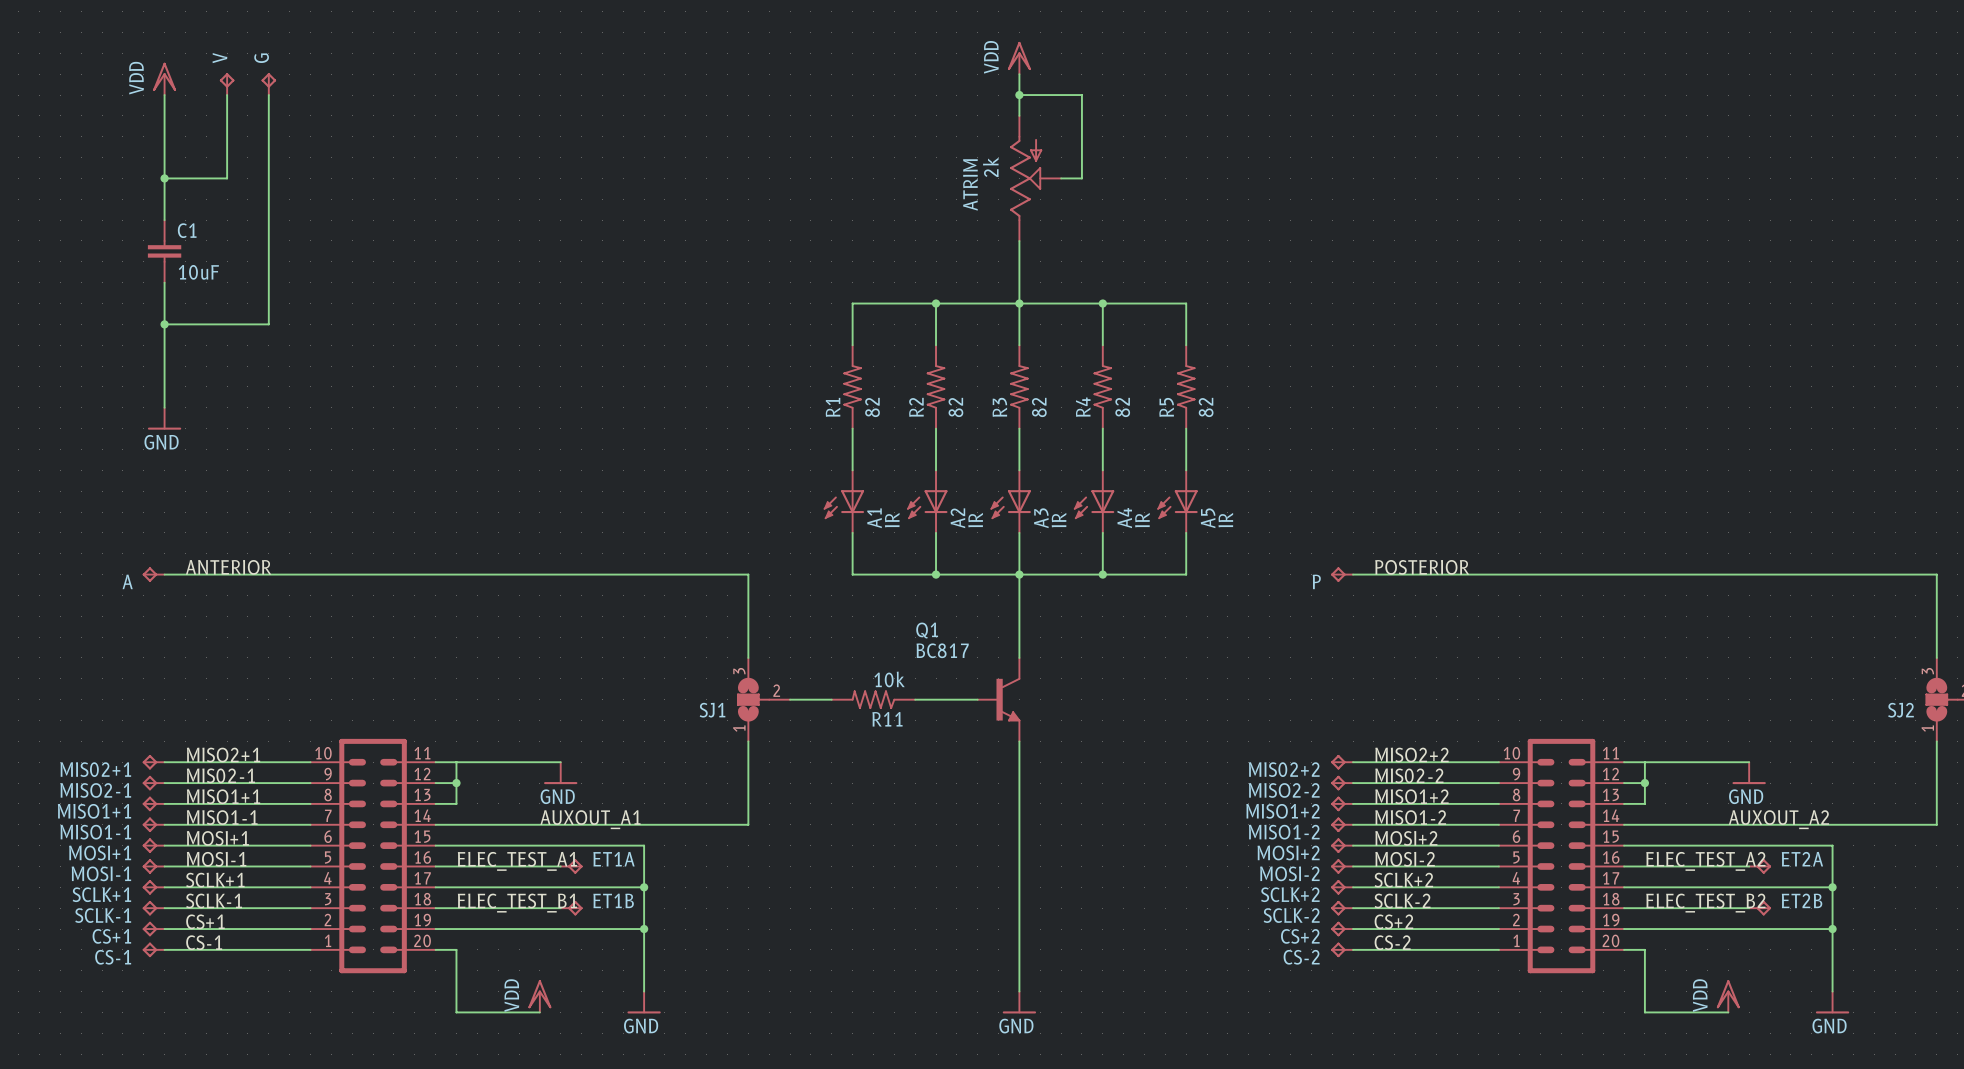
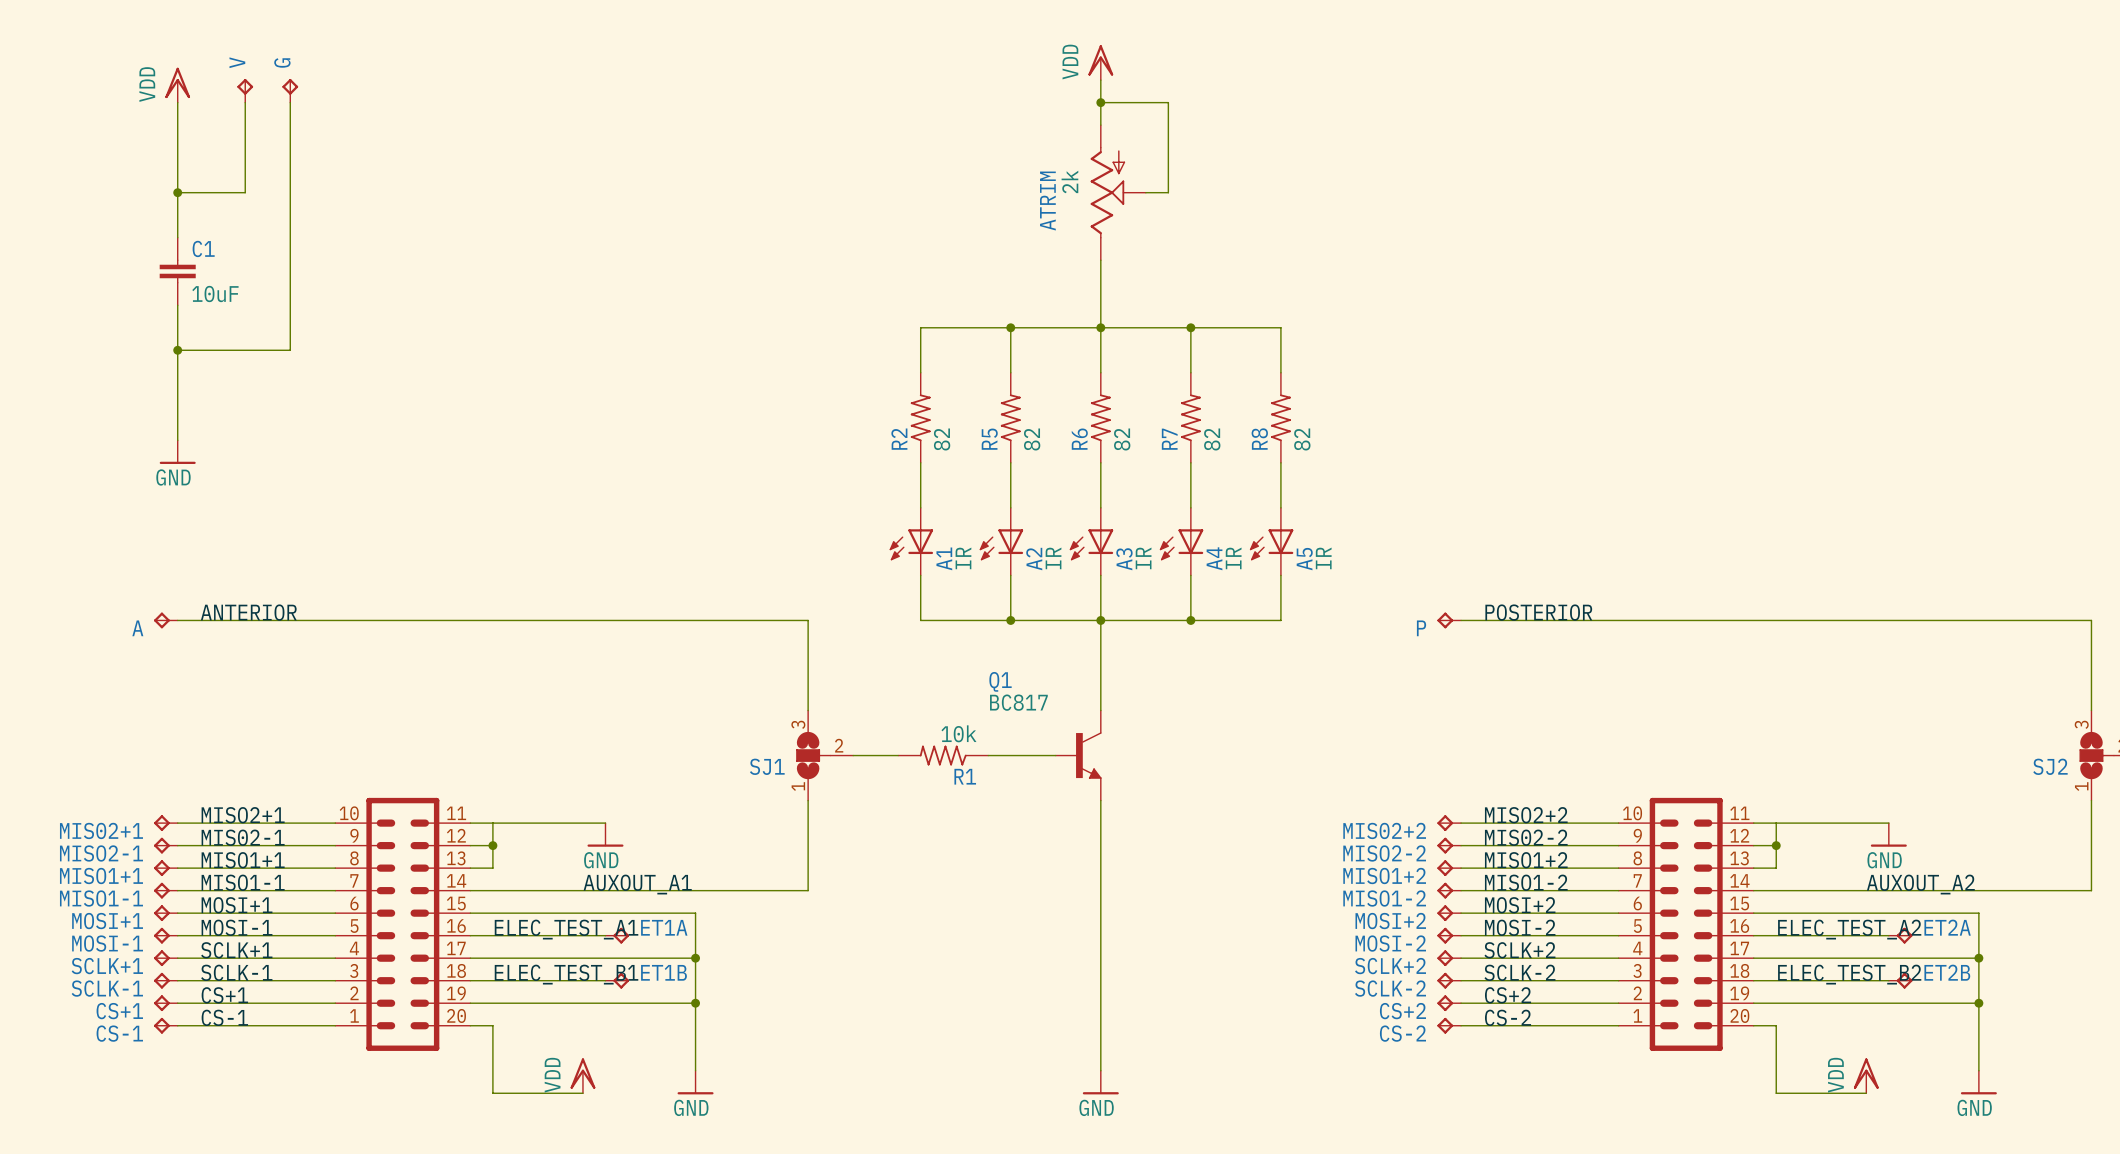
R1 name: R1 (833, 407) -> R2 (899, 439)
R2 name: R2 (916, 407) -> R5 (989, 439)
R3 name: R3 (999, 407) -> R6 (1079, 439)
R4 name: R4 (1083, 407) -> R7 (1169, 439)
R5 name: R5 (1166, 407) -> R8 (1259, 439)
R11 name: R11 (887, 719) -> R1 (965, 776)

